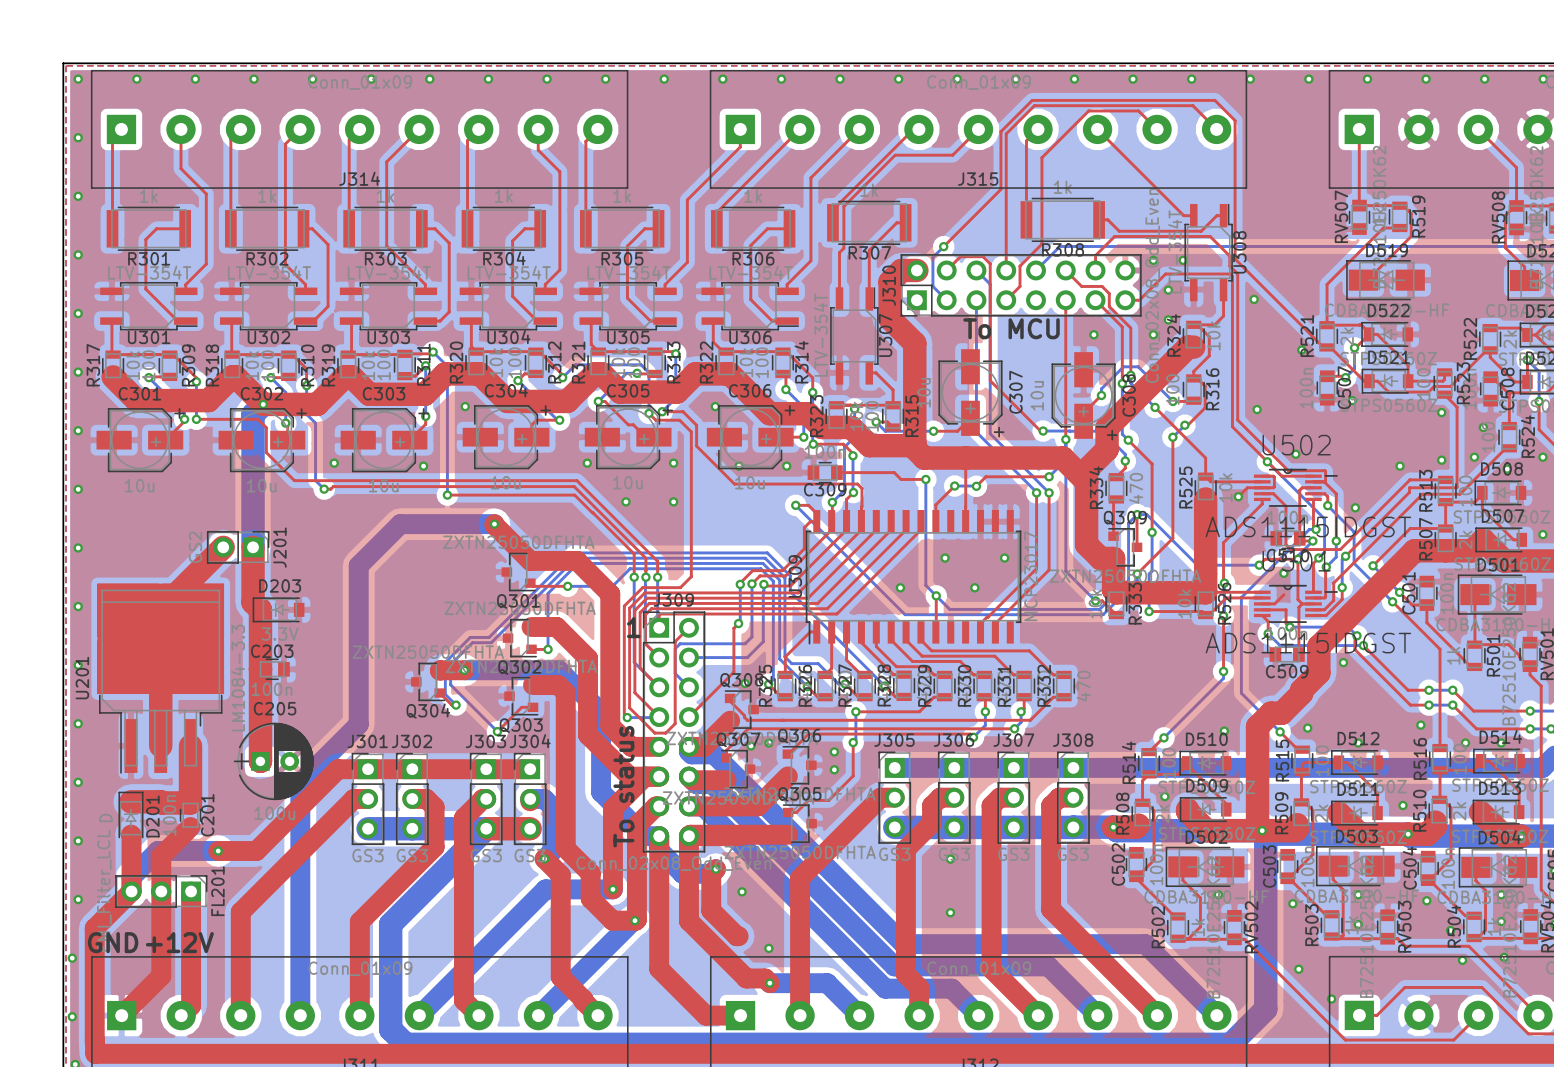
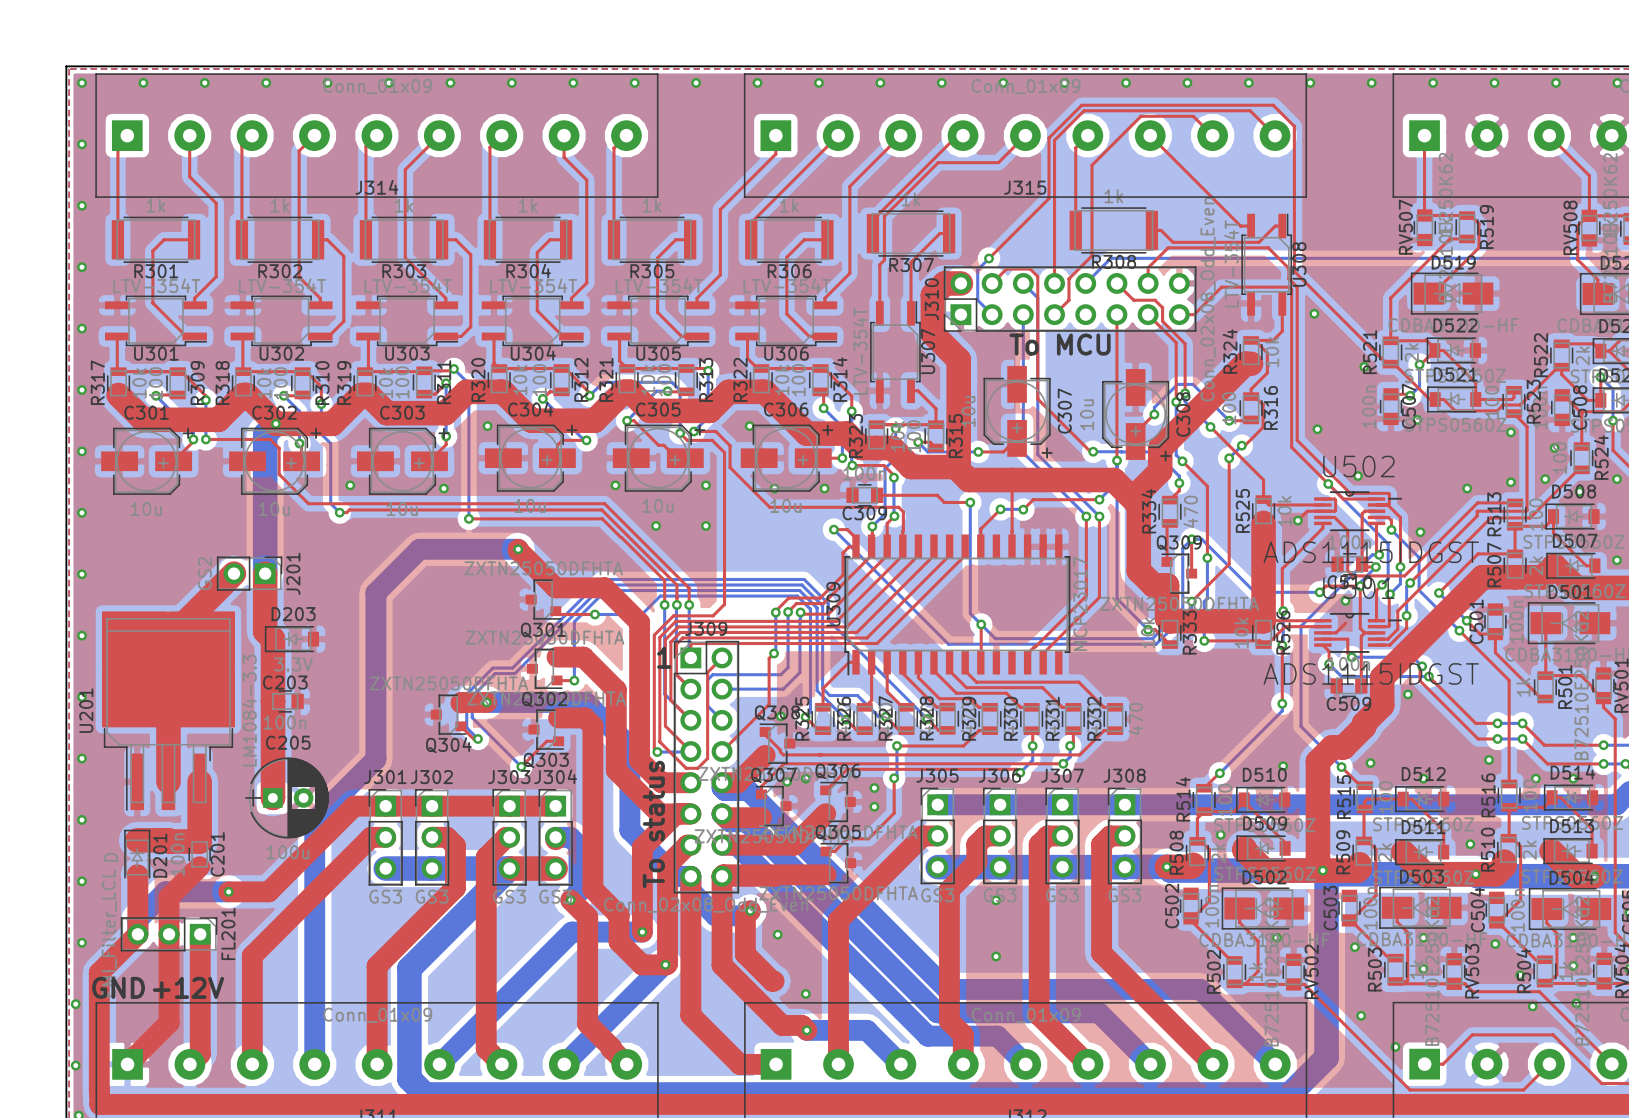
via: (1153, 260) -> none
via: (1183, 260) -> none
via: (1168, 290) -> none
via: (1168, 319) -> none
via: (1093, 334) -> none
via: (1153, 334) -> none
via: (945, 558) -> none
via: (1004, 558) -> none
via: (900, 587) -> none
via: (974, 587) -> none

